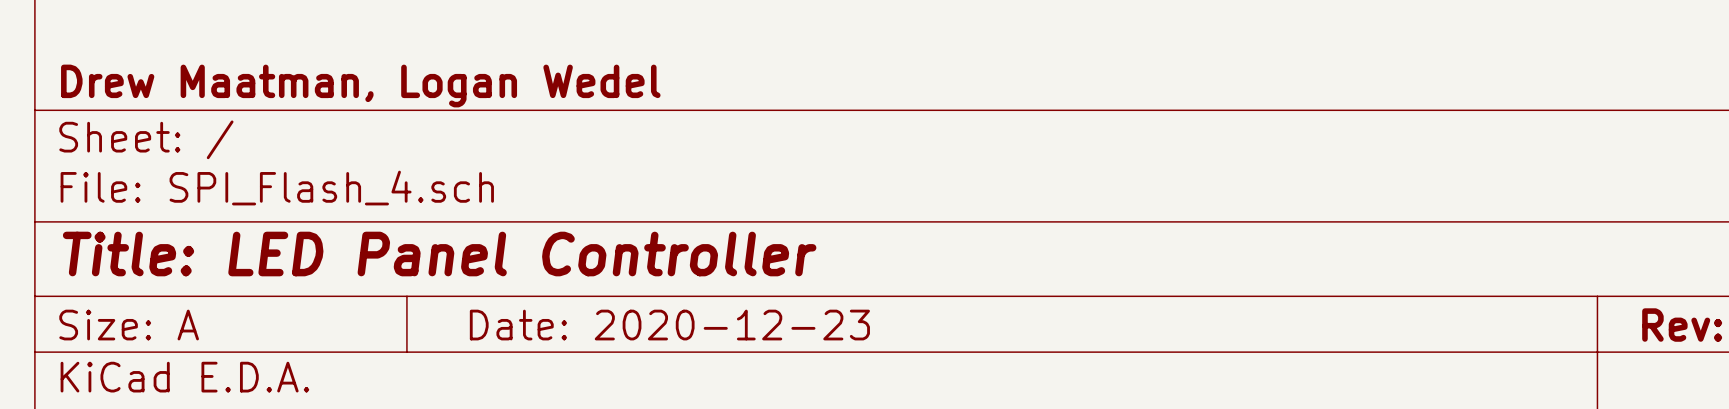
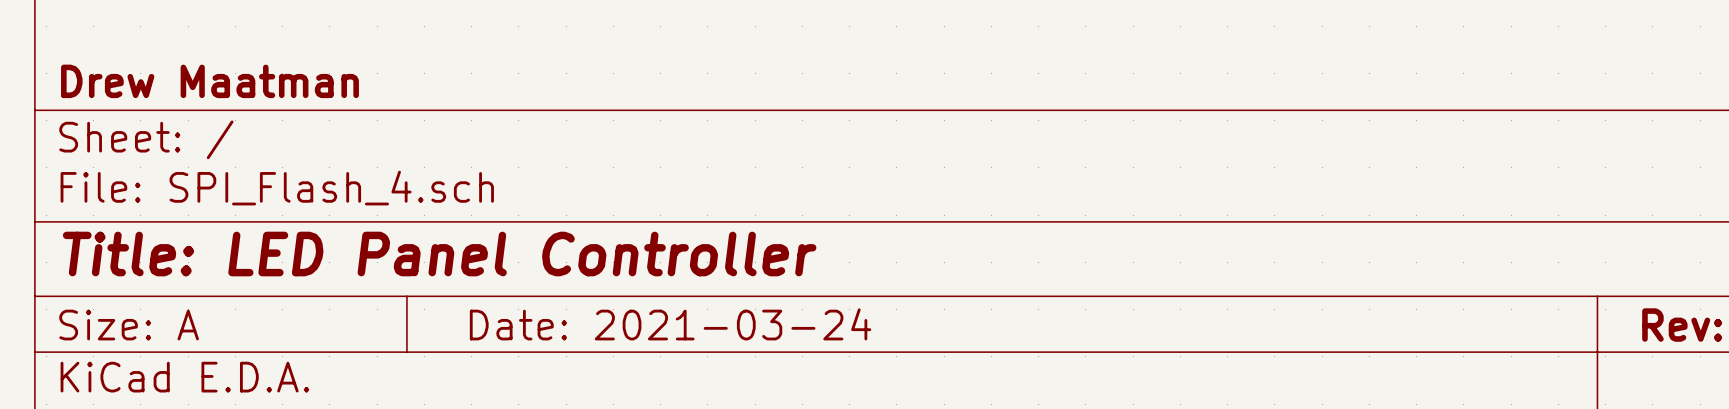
title block: Drew Maatman, Logan Wedel (360, 86) -> Drew Maatman (209, 81)
title block: Date: 2020-12-23 (669, 325) -> Date: 2021-03-24 (670, 324)

